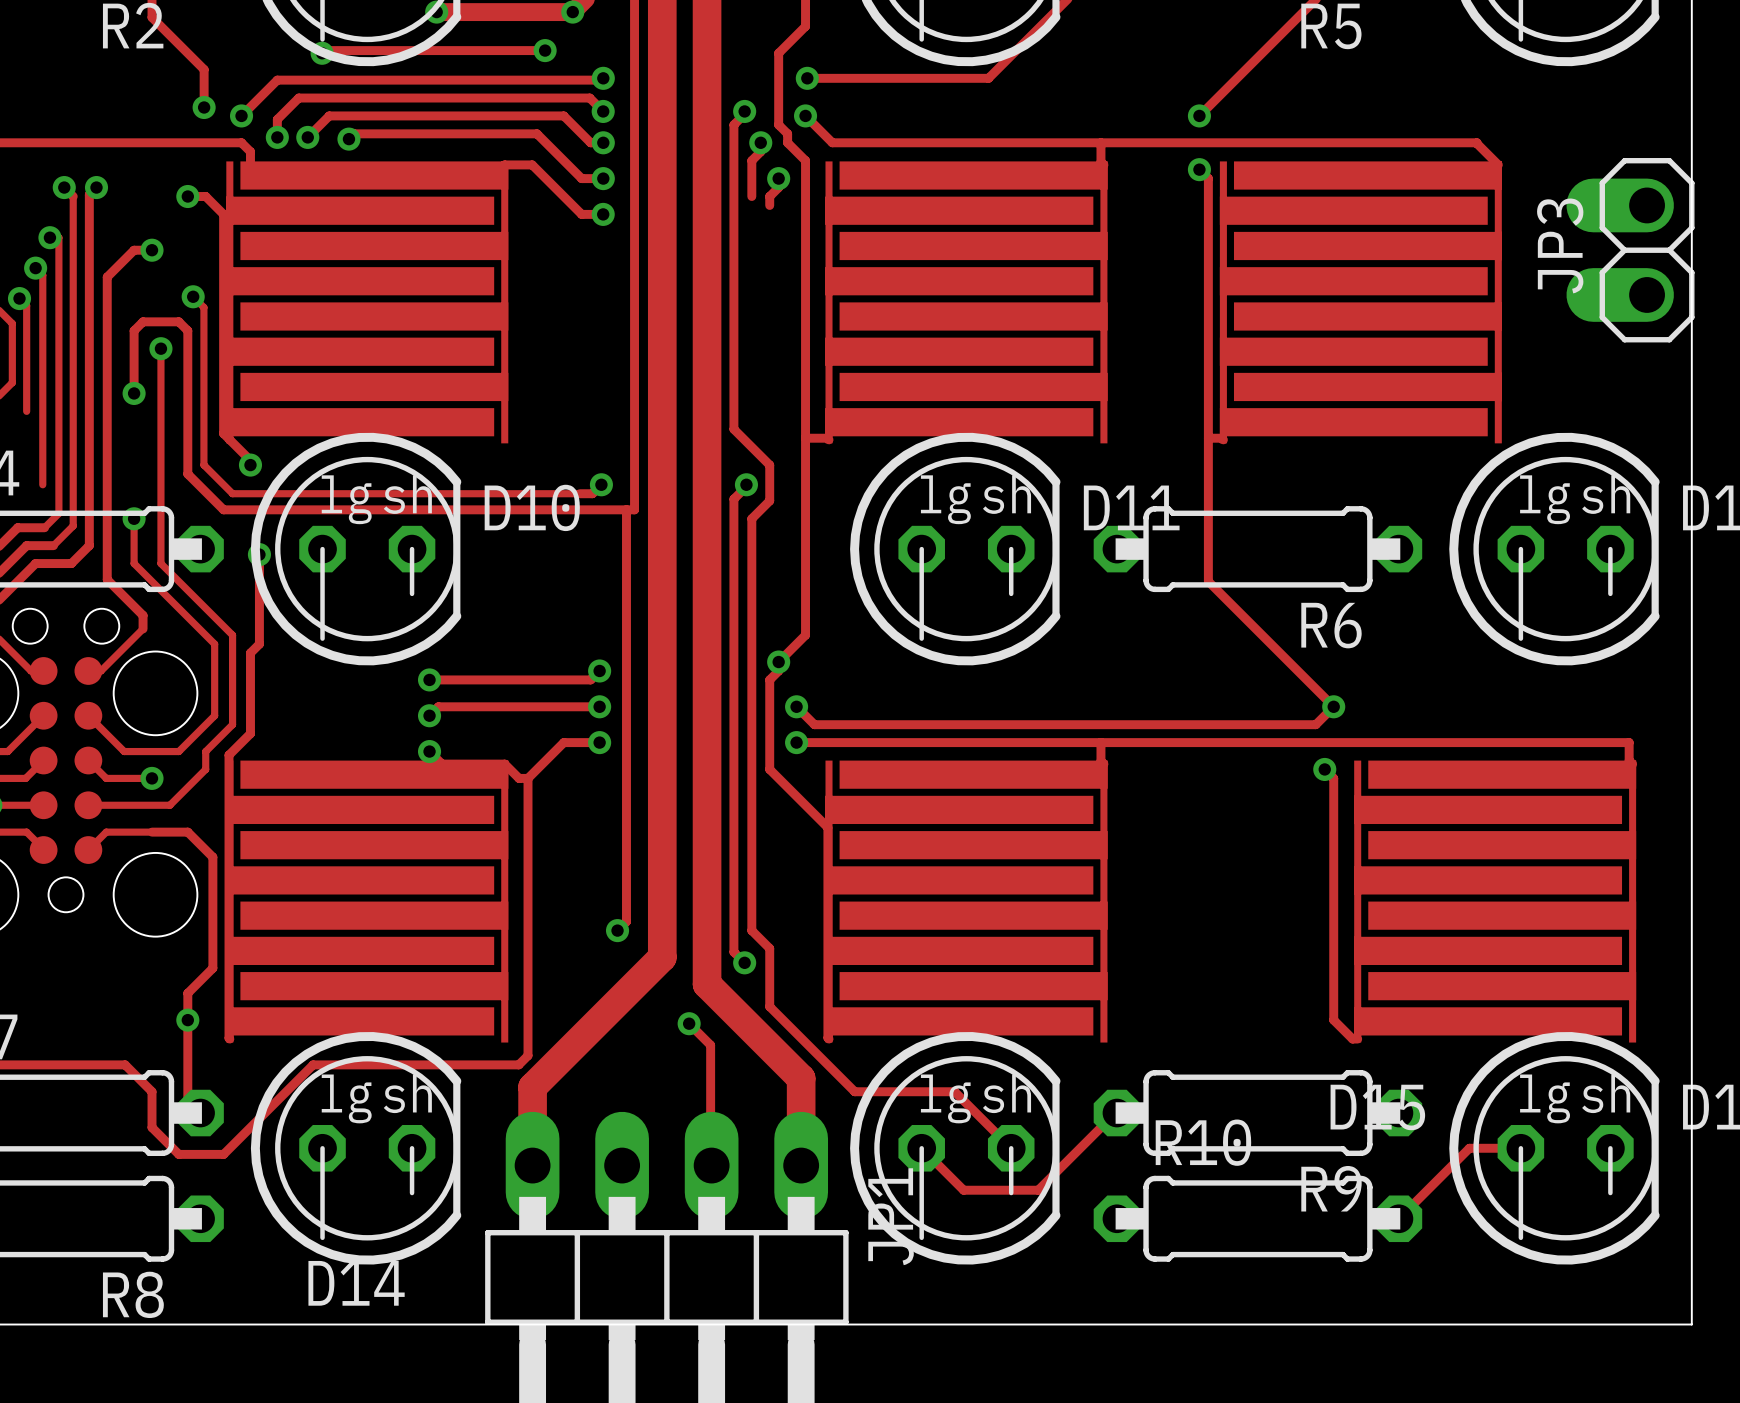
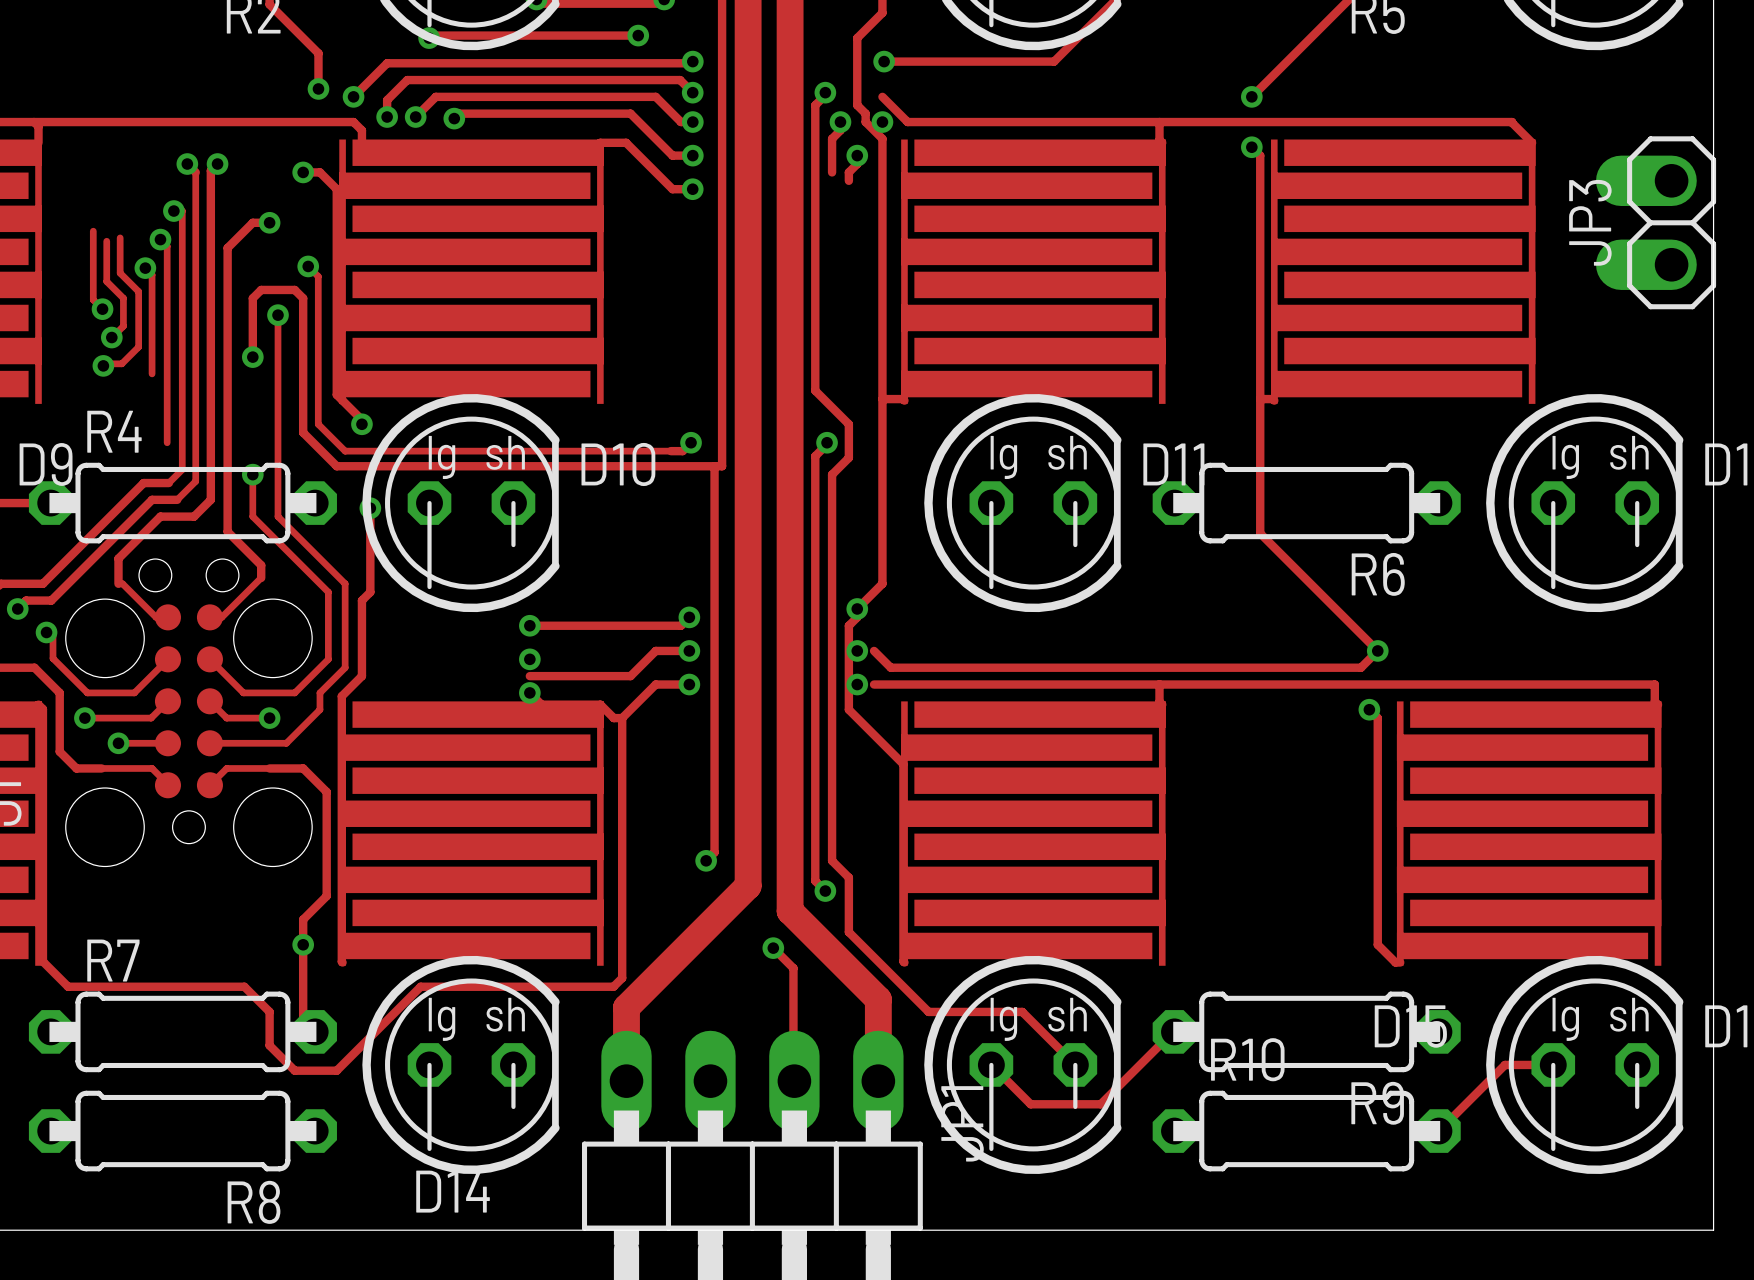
via position: (805, 115) -> (882, 122)
track: (563, 706) (438, 706) (429, 715) -> (655, 650) (630, 676) (529, 676)
via position: (796, 706) -> (857, 650)
via position: (796, 742) -> (857, 684)

